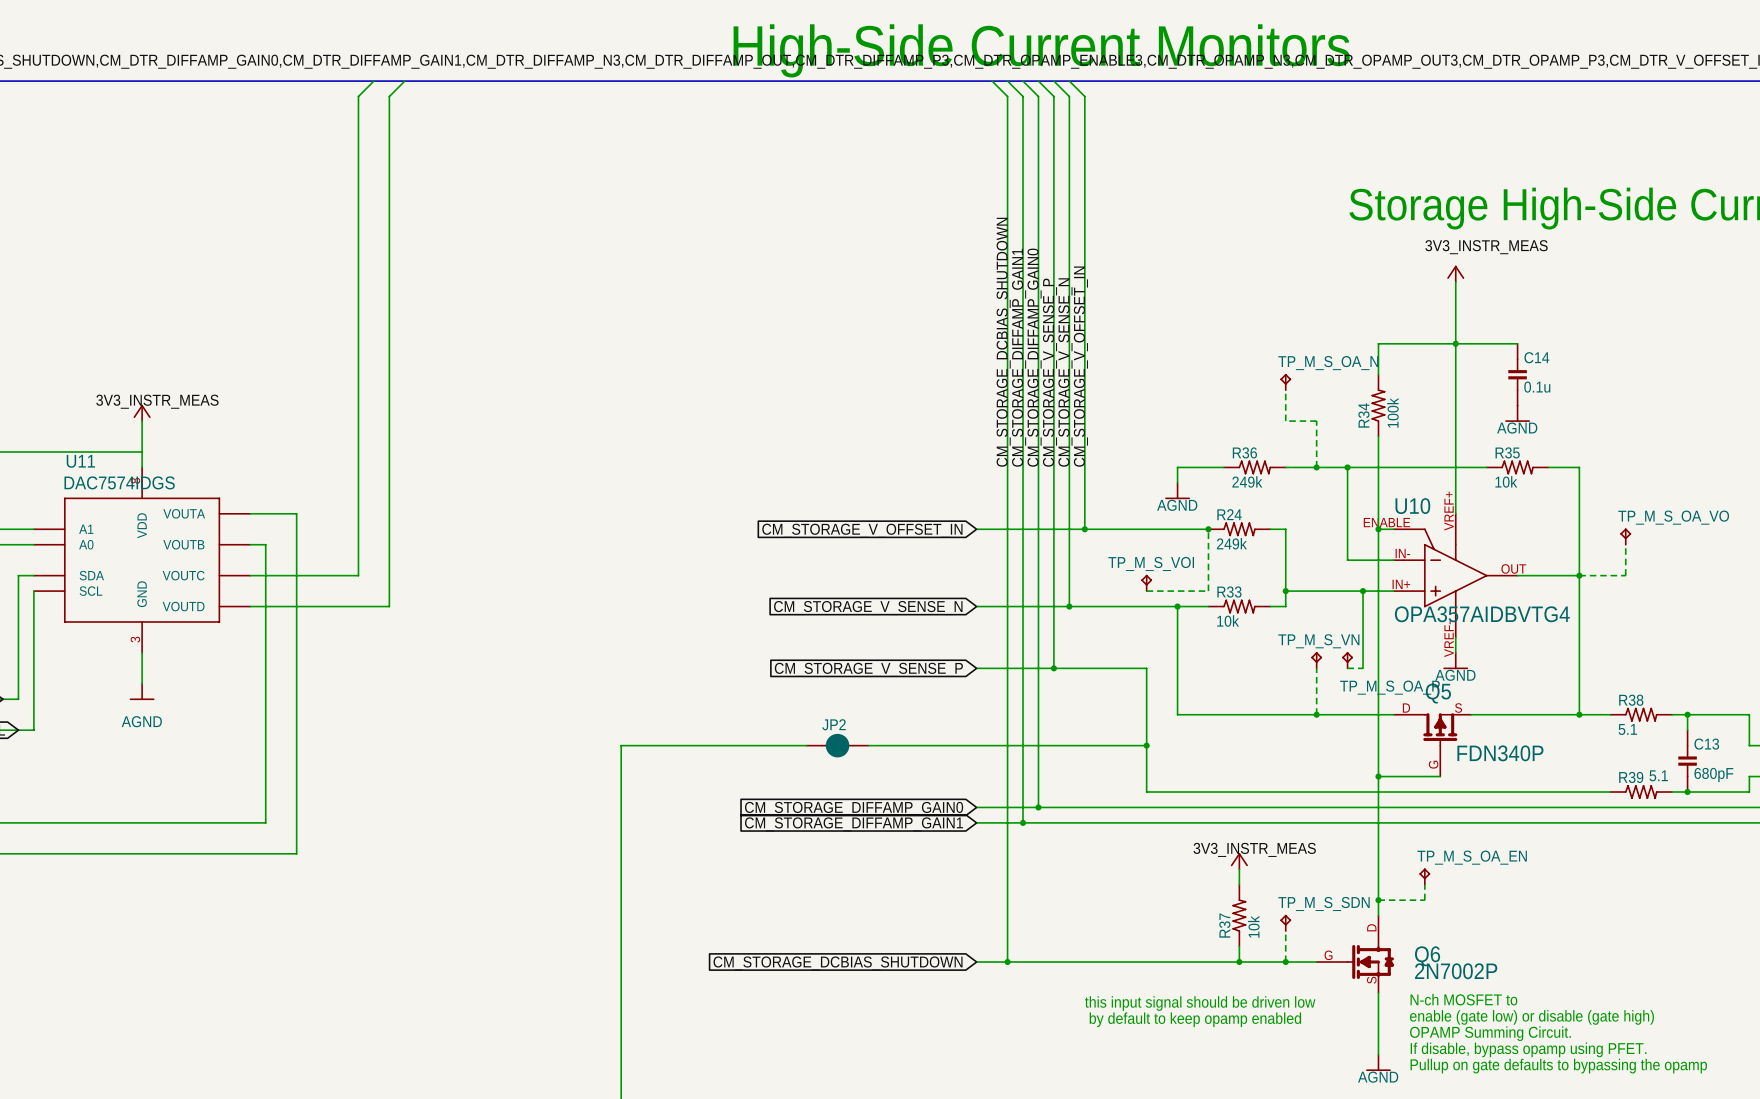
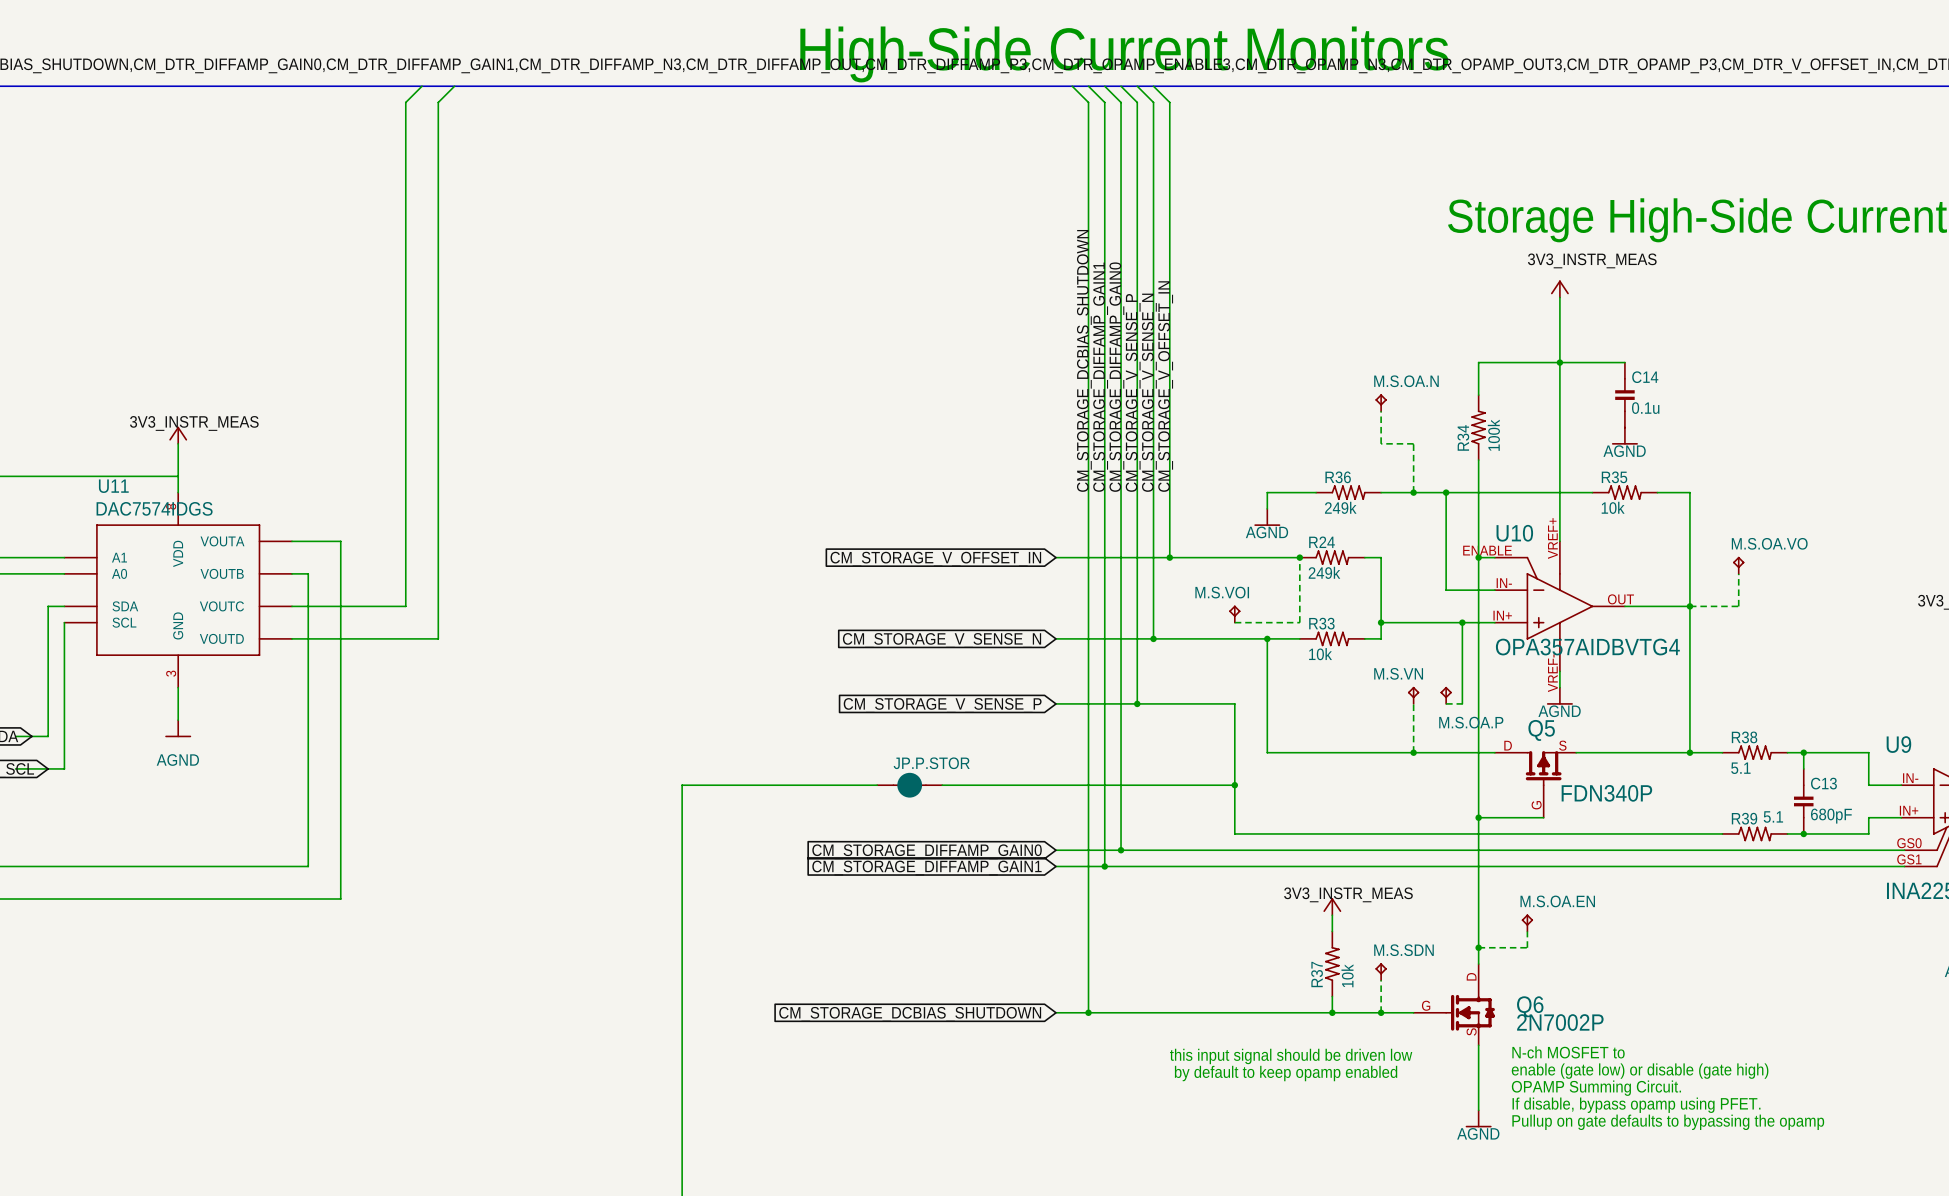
TP_M_S_OA_N name: TP_M_S_OA_N (1328, 363) -> M.S.OA.N (1406, 381)
TP_M_S_OA_VO name: TP_M_S_OA_VO (1673, 517) -> M.S.OA.VO (1769, 543)
TP_M_S_VOI name: TP_M_S_VOI (1151, 563) -> M.S.VOI (1222, 592)
TP_M_S_VN name: TP_M_S_VN (1318, 641) -> M.S.VN (1398, 673)
TP_M_S_OA_P name: TP_M_S_OA_P (1389, 687) -> M.S.OA.P (1471, 722)
JP2 name: JP2 (834, 724) -> JP.P.STOR (931, 763)
TP_M_S_OA_EN name: TP_M_S_OA_EN (1472, 857) -> M.S.OA.EN (1557, 901)
TP_M_S_SDN name: TP_M_S_SDN (1324, 903) -> M.S.SDN (1403, 950)

